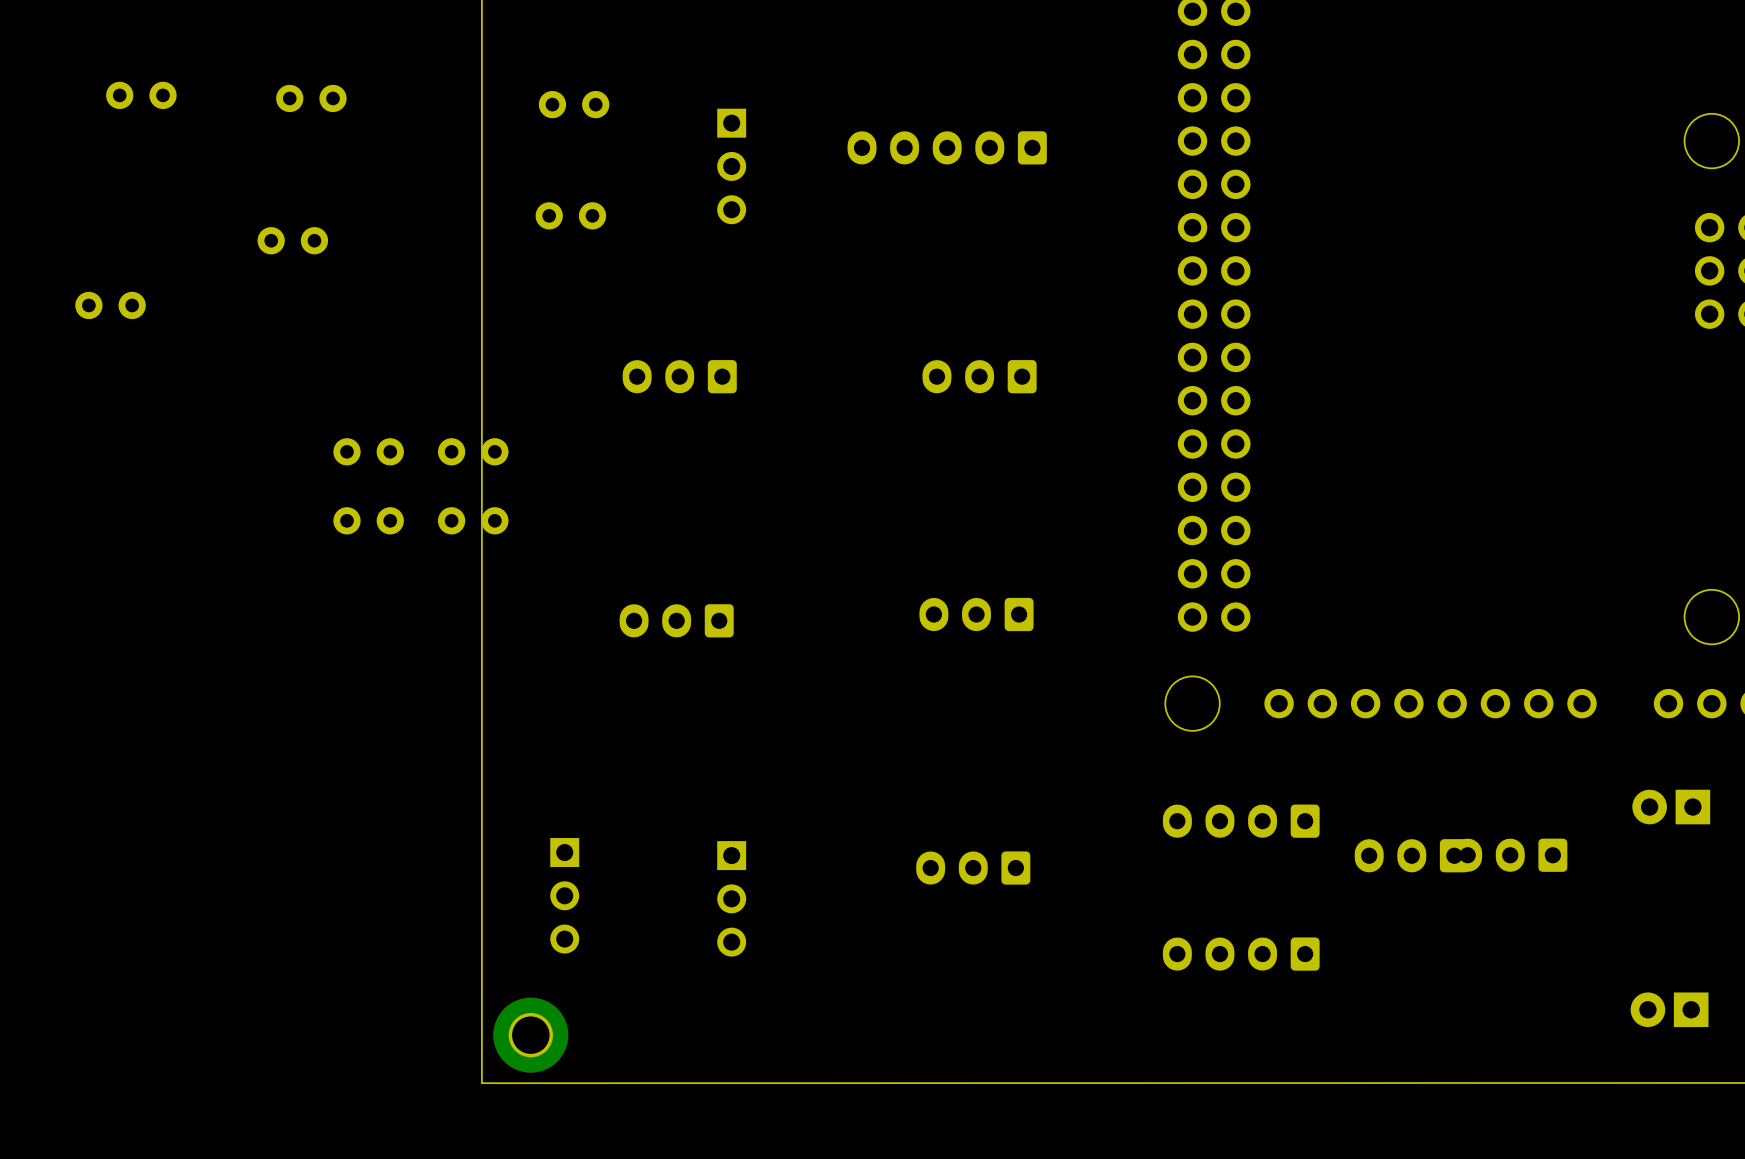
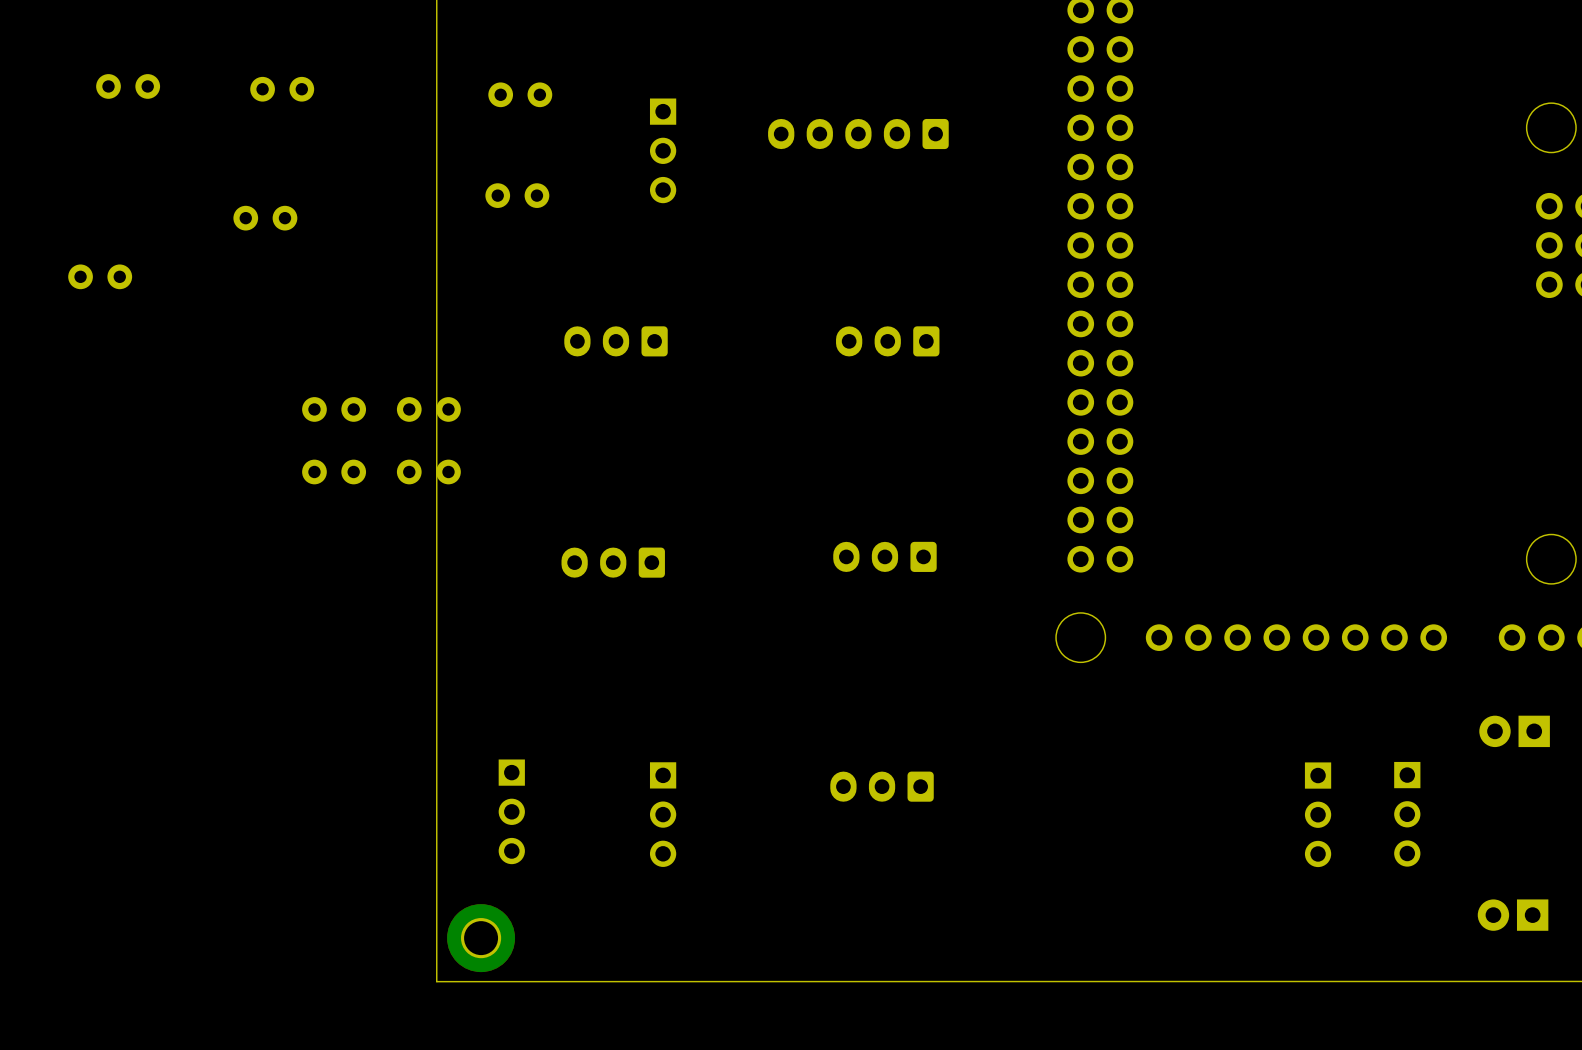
part: (1241, 821) -> none
part: (1411, 855) -> none
part: (1510, 855) -> none
part: none -> (1407, 814)
part: none -> (1318, 814)
part: (1241, 954) -> none

